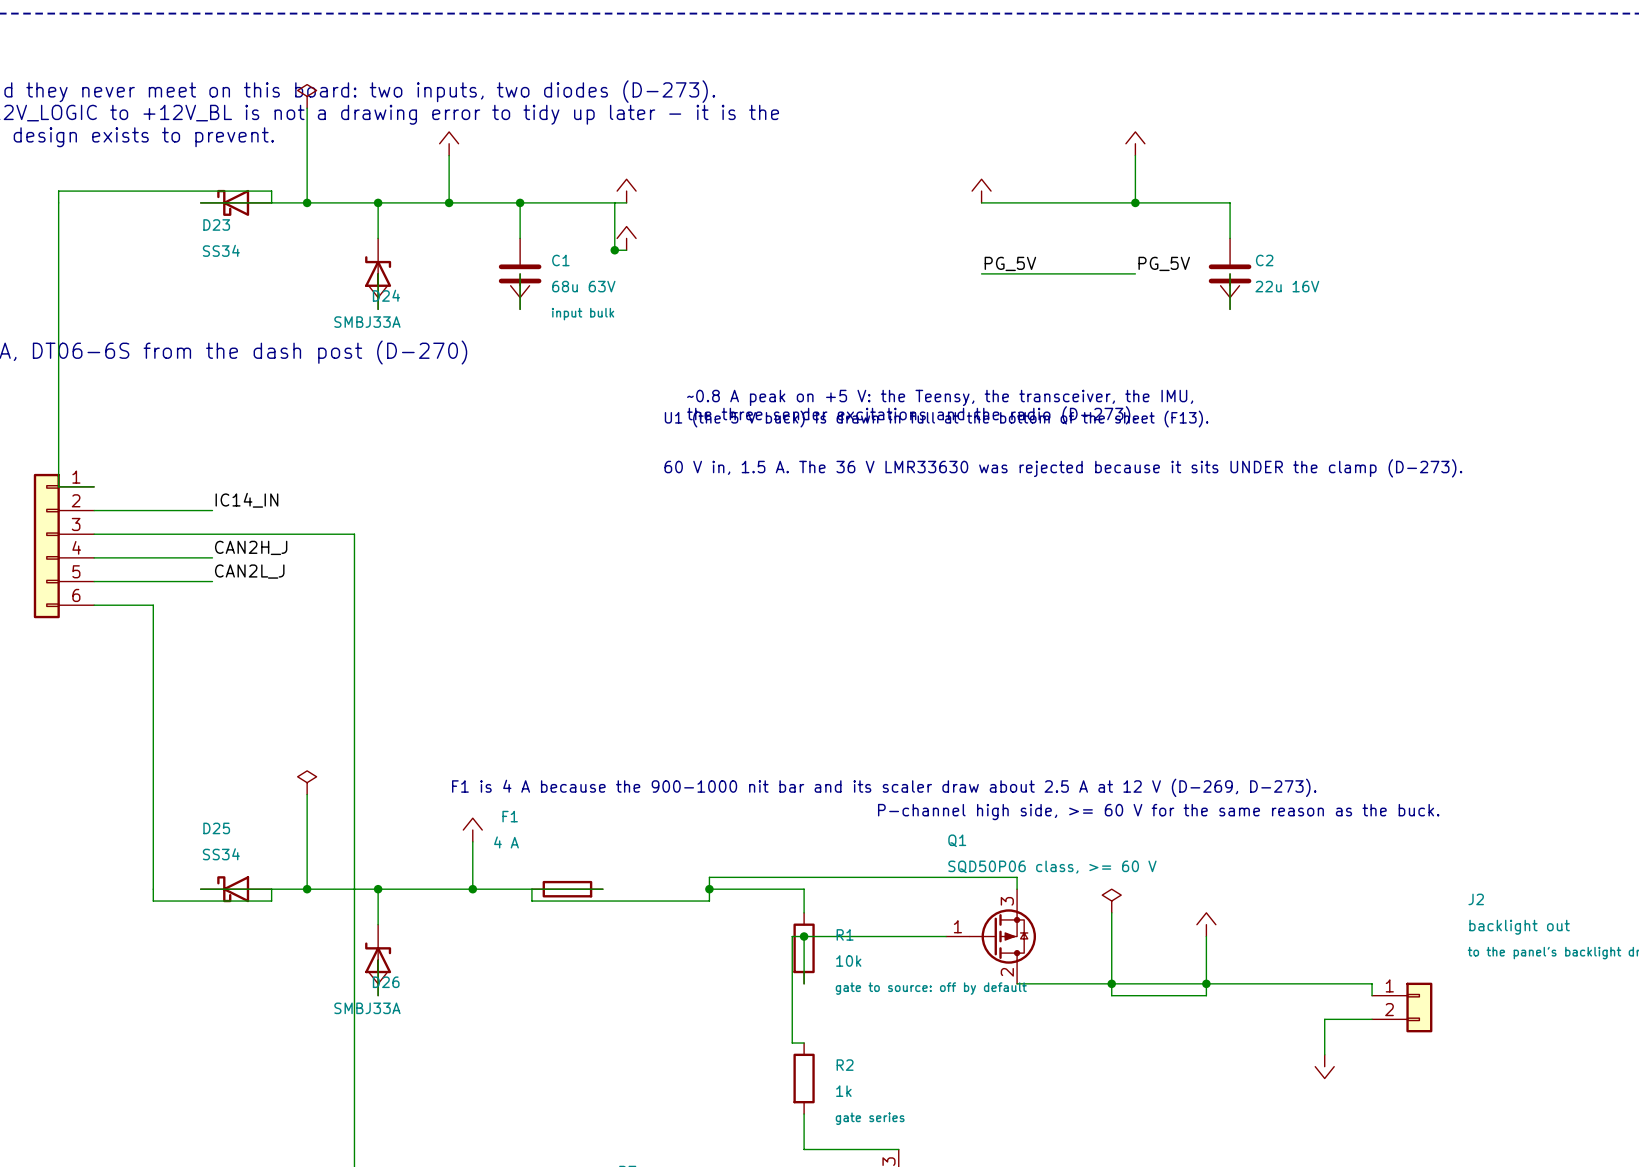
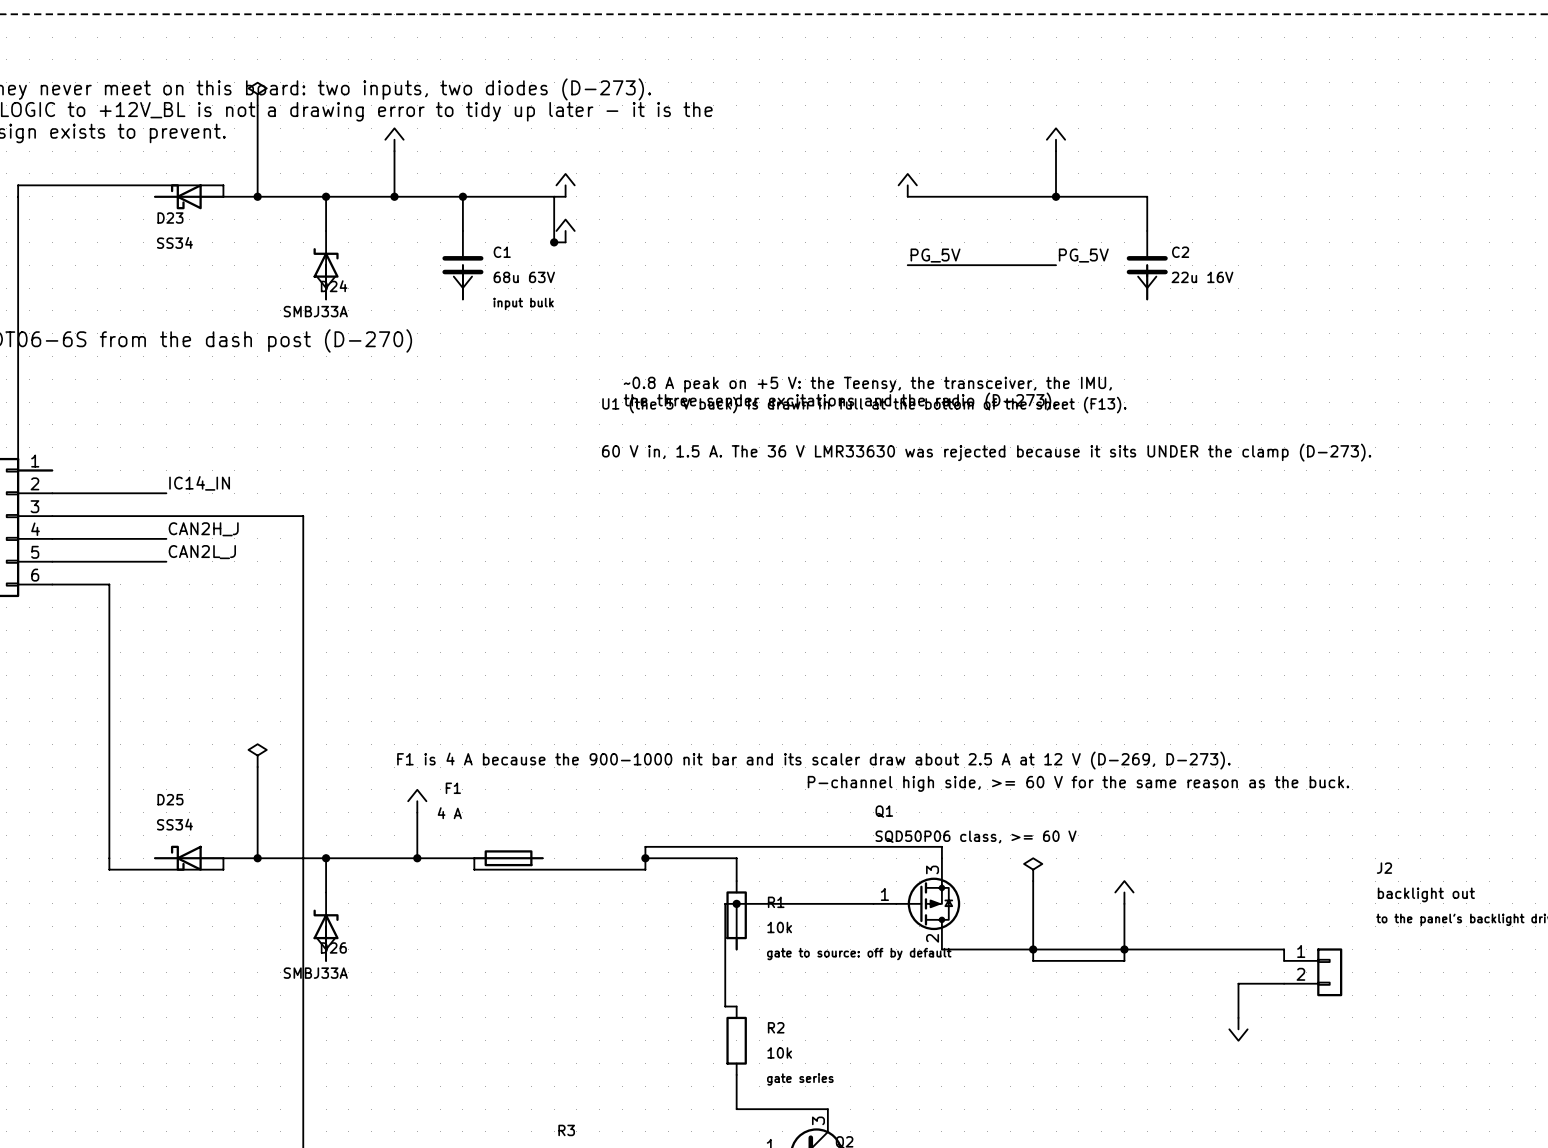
R2 value: 1k (843, 1091) -> 10k (779, 1052)

